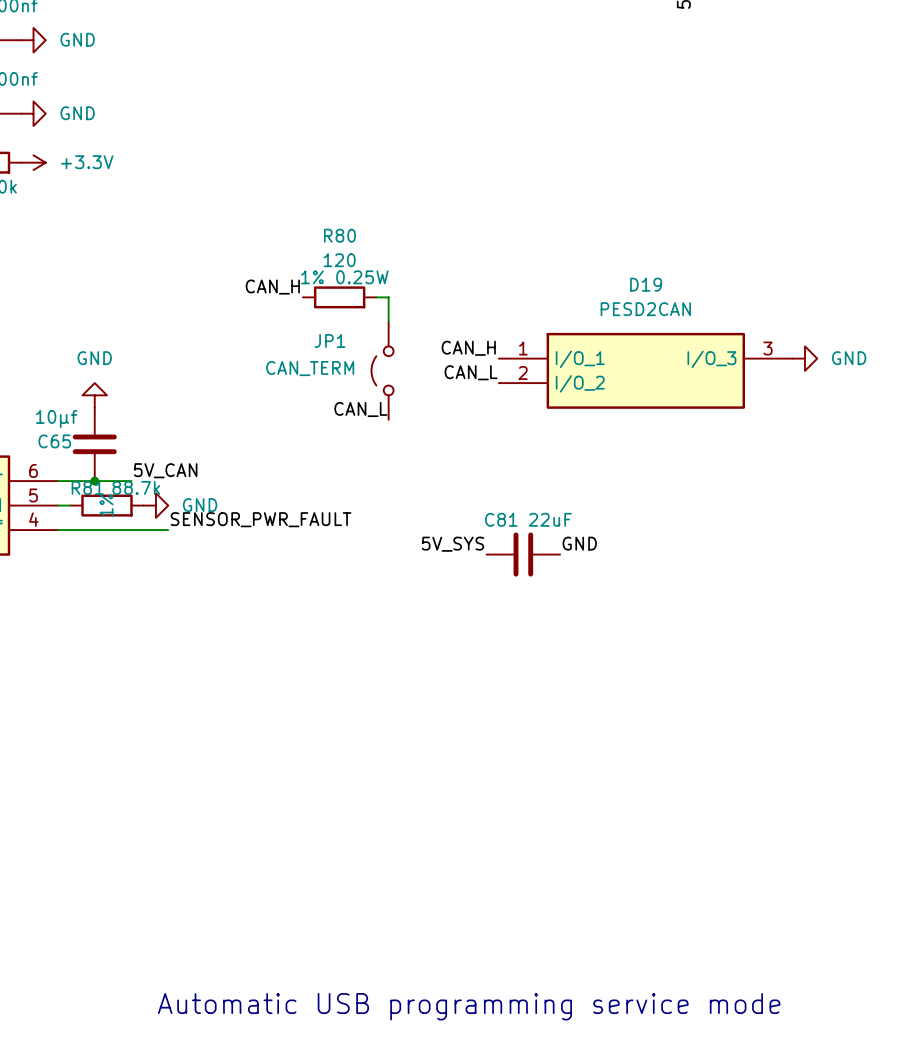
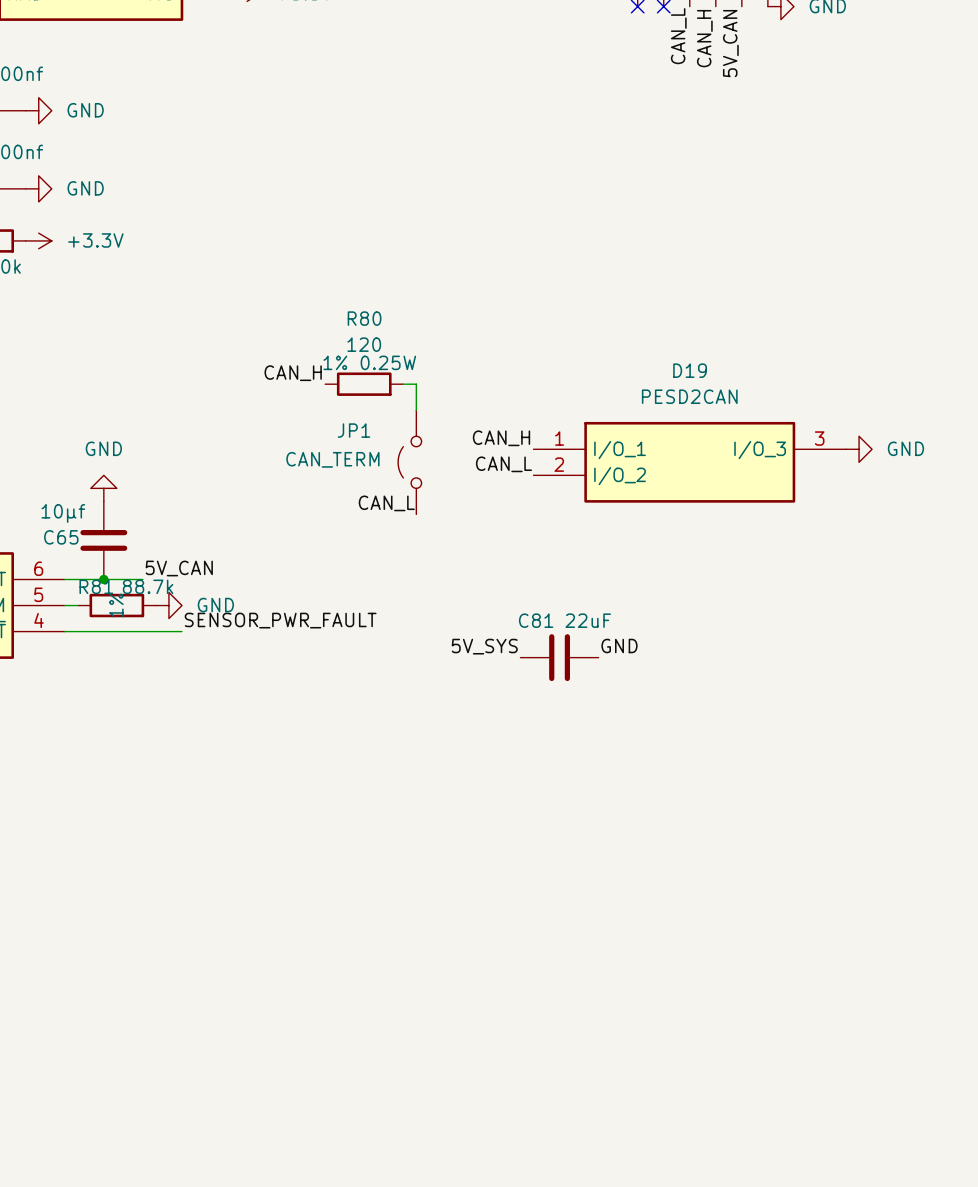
text: Automatic USB programming service mode (469, 1006) -> none

